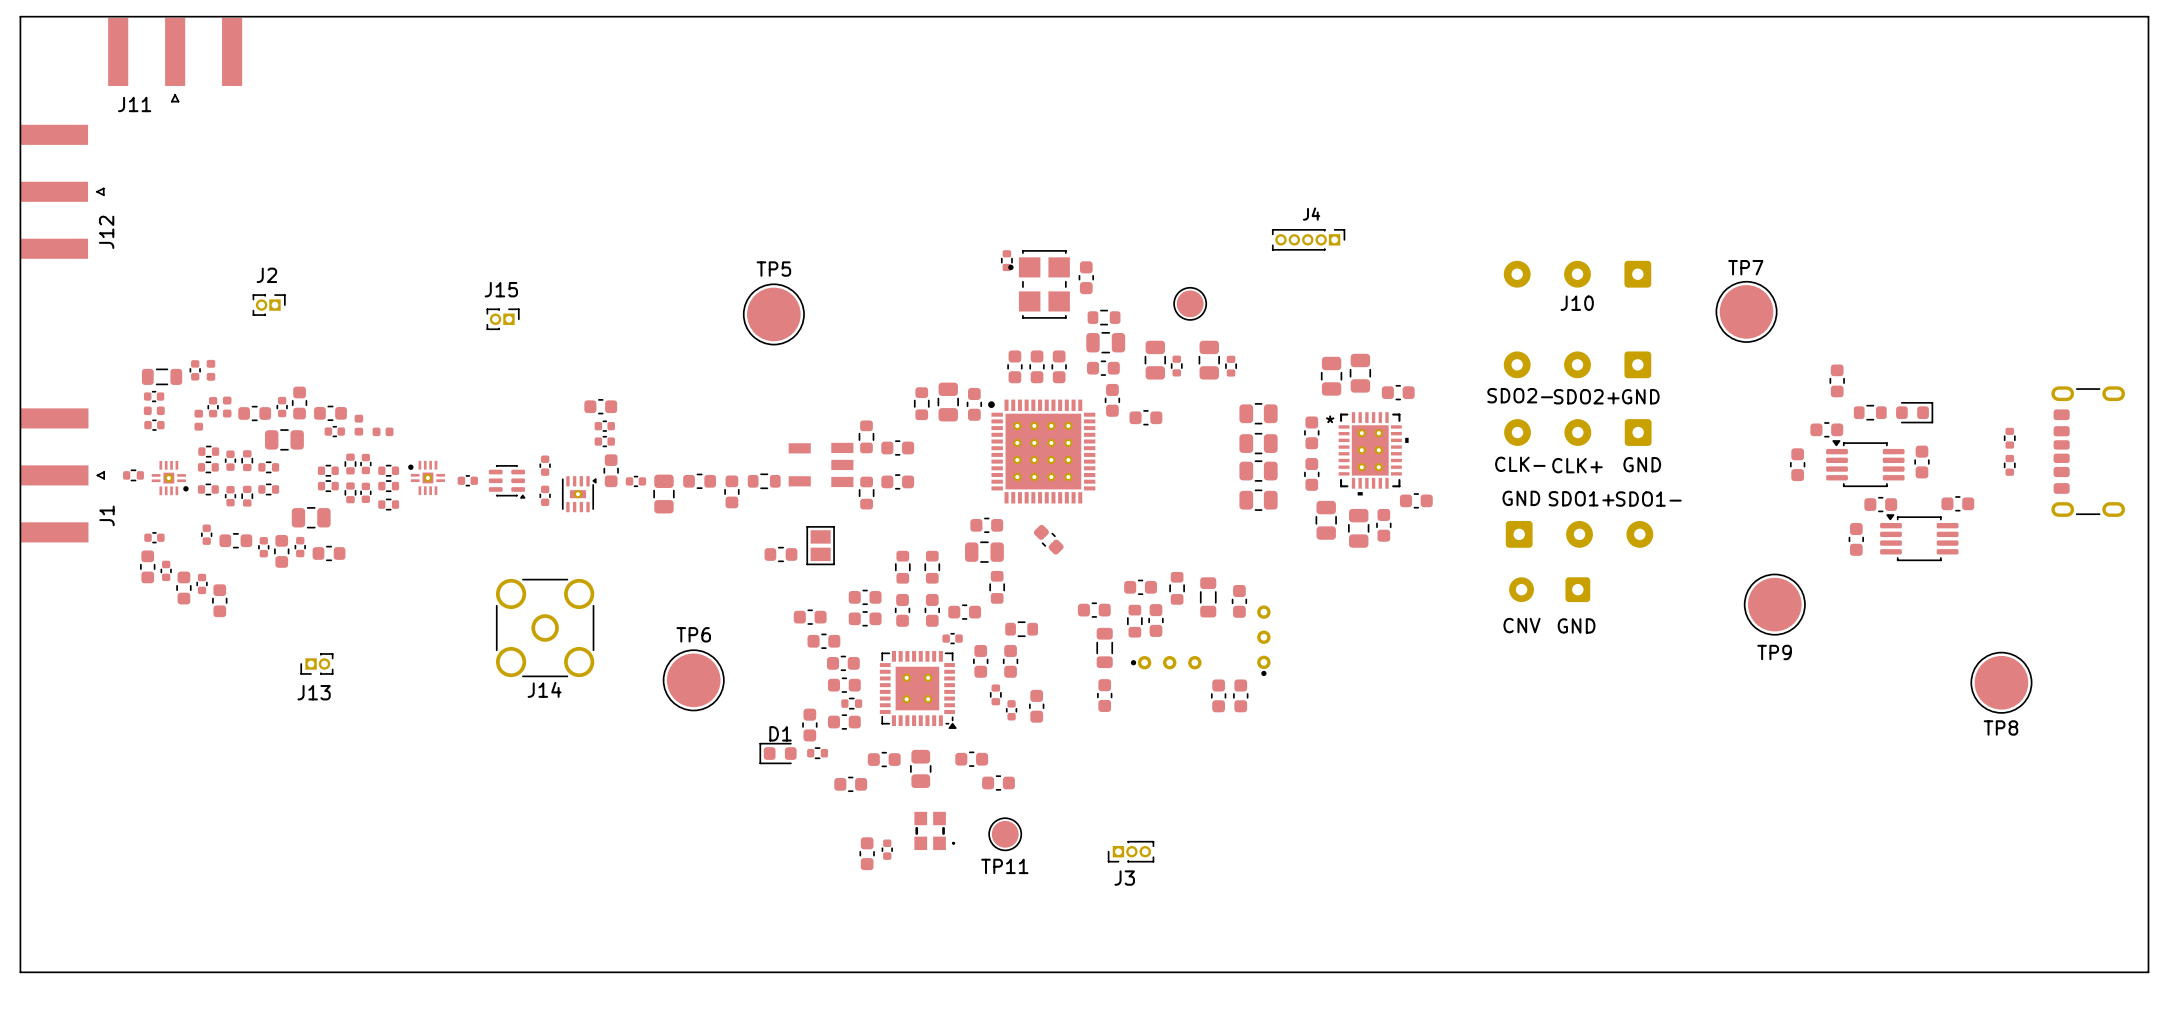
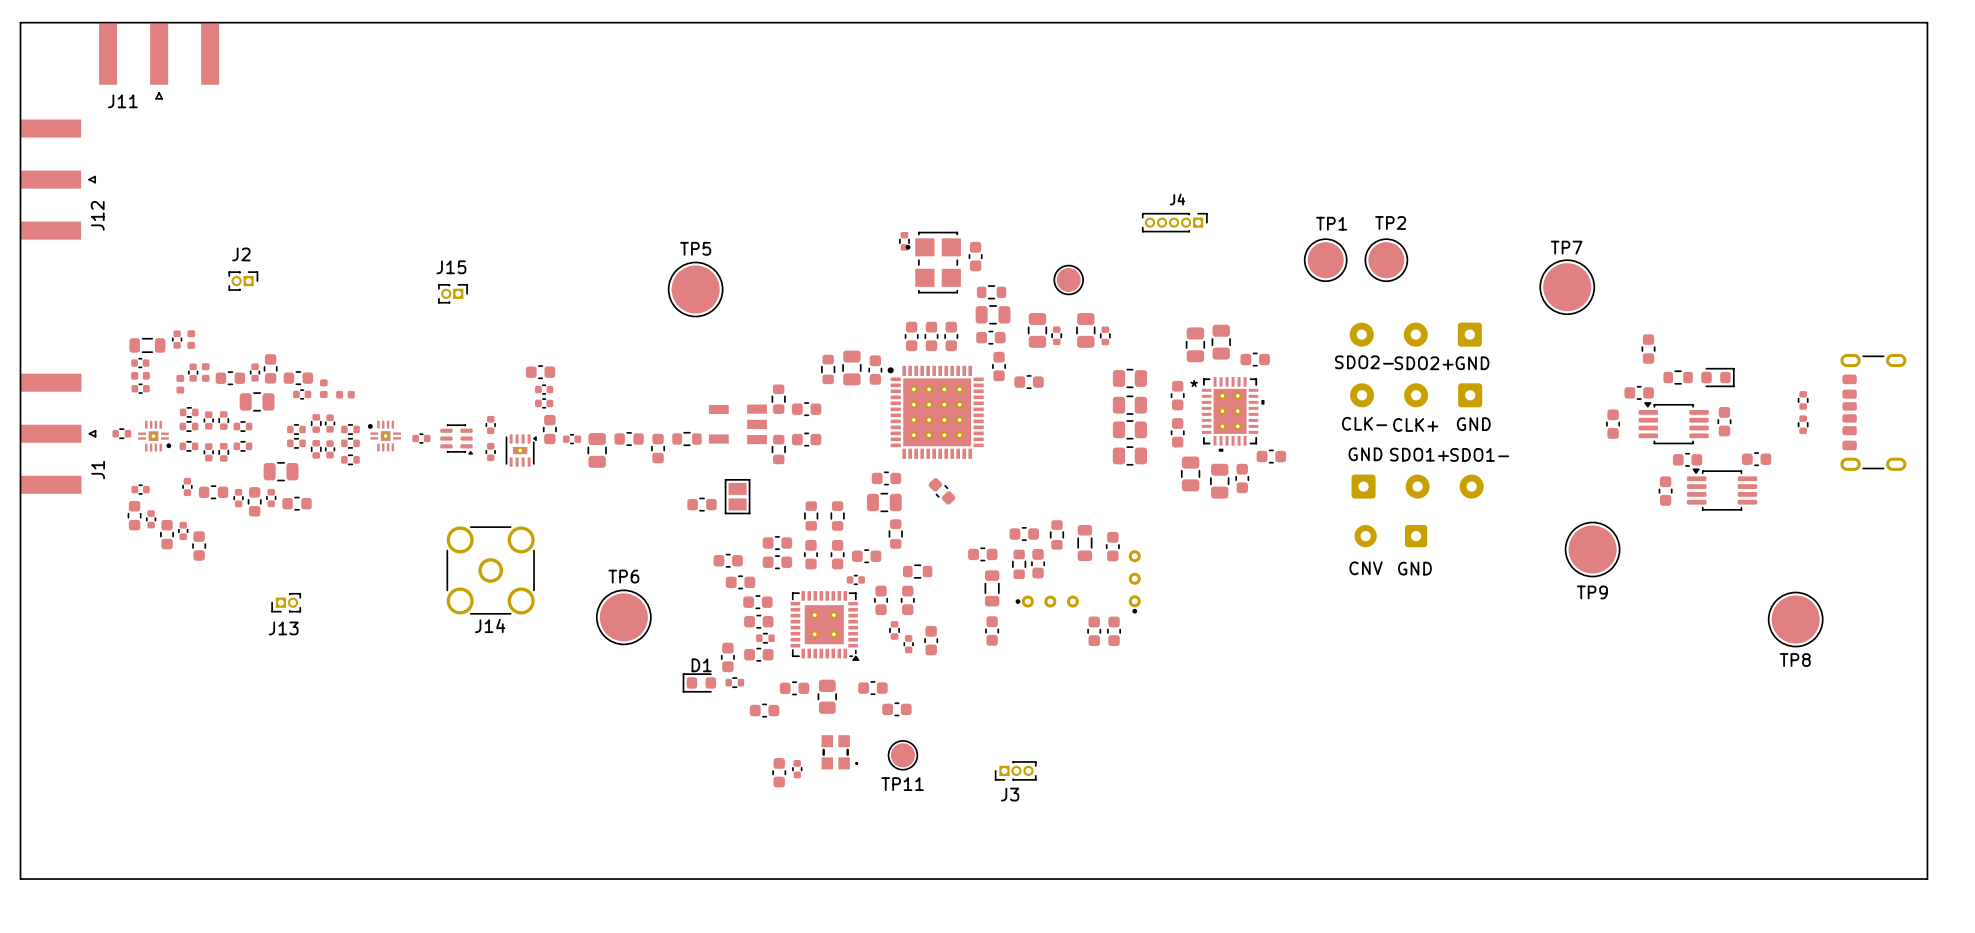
J10: (1577, 274) -> none
TP1: none -> (1325, 260)
TP2: none -> (1386, 260)

